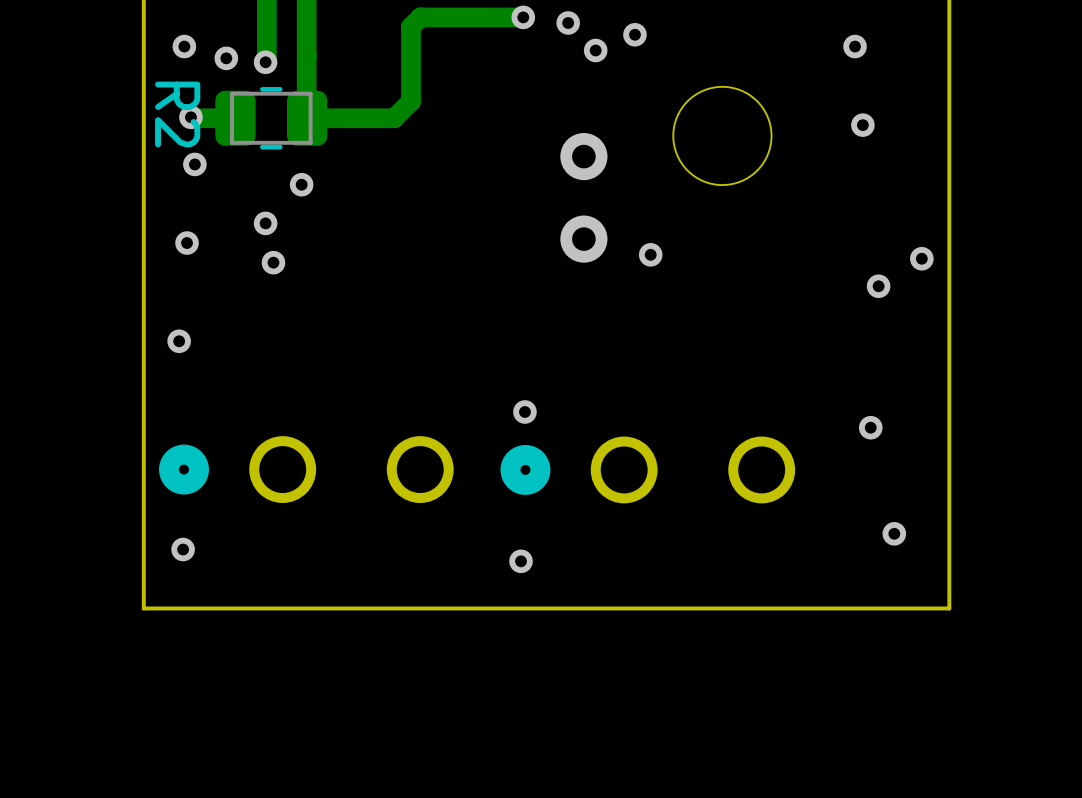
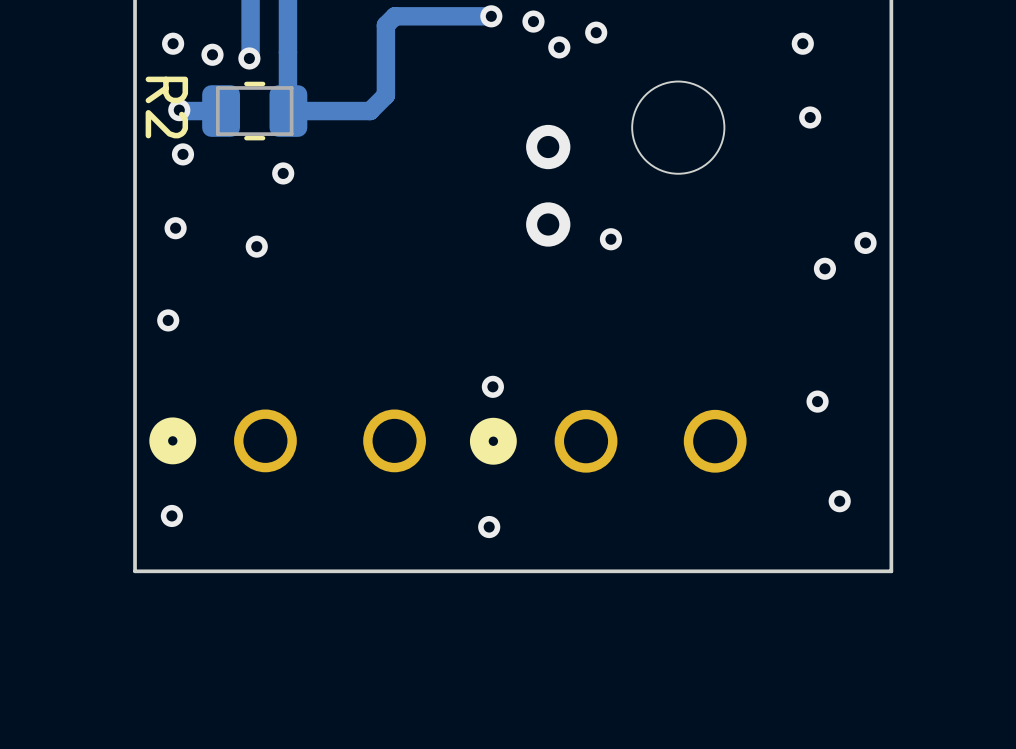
via: (265, 223) -> none

